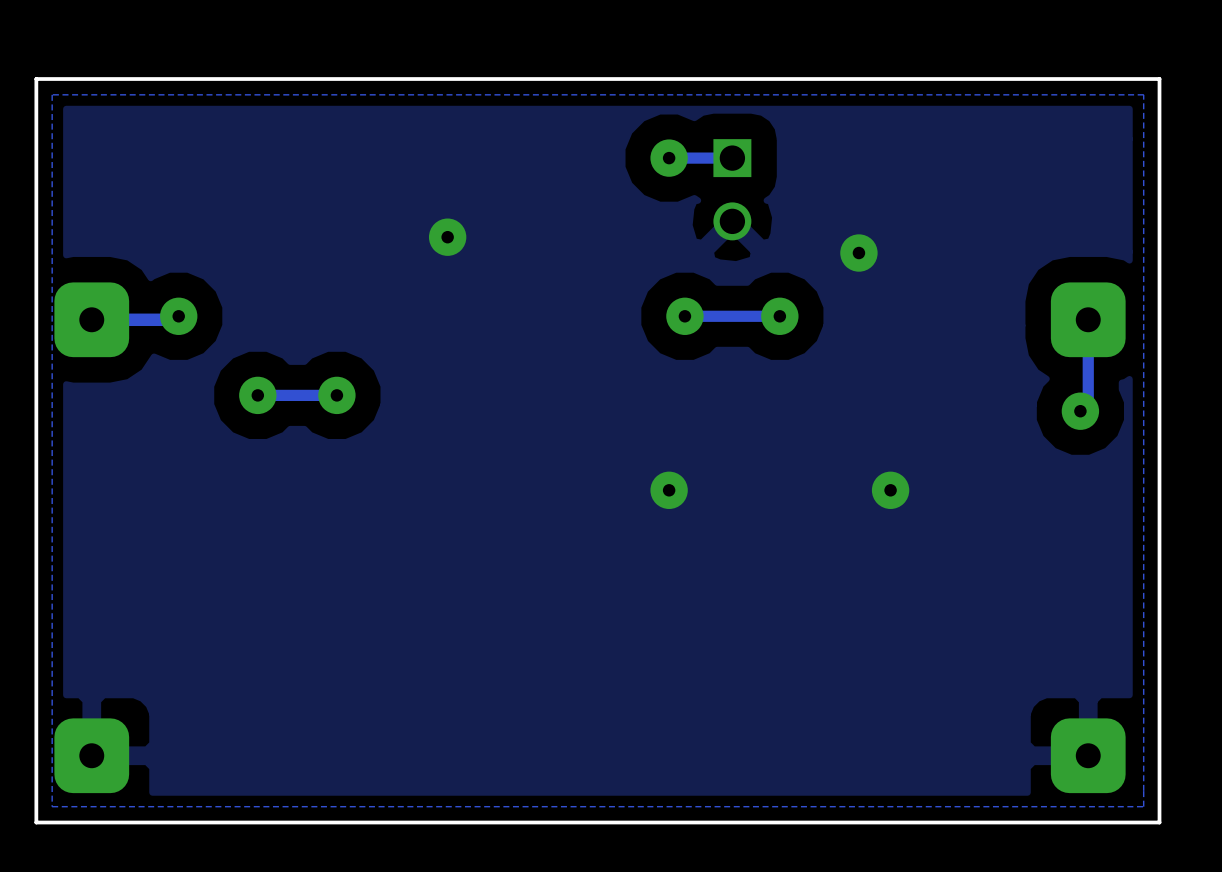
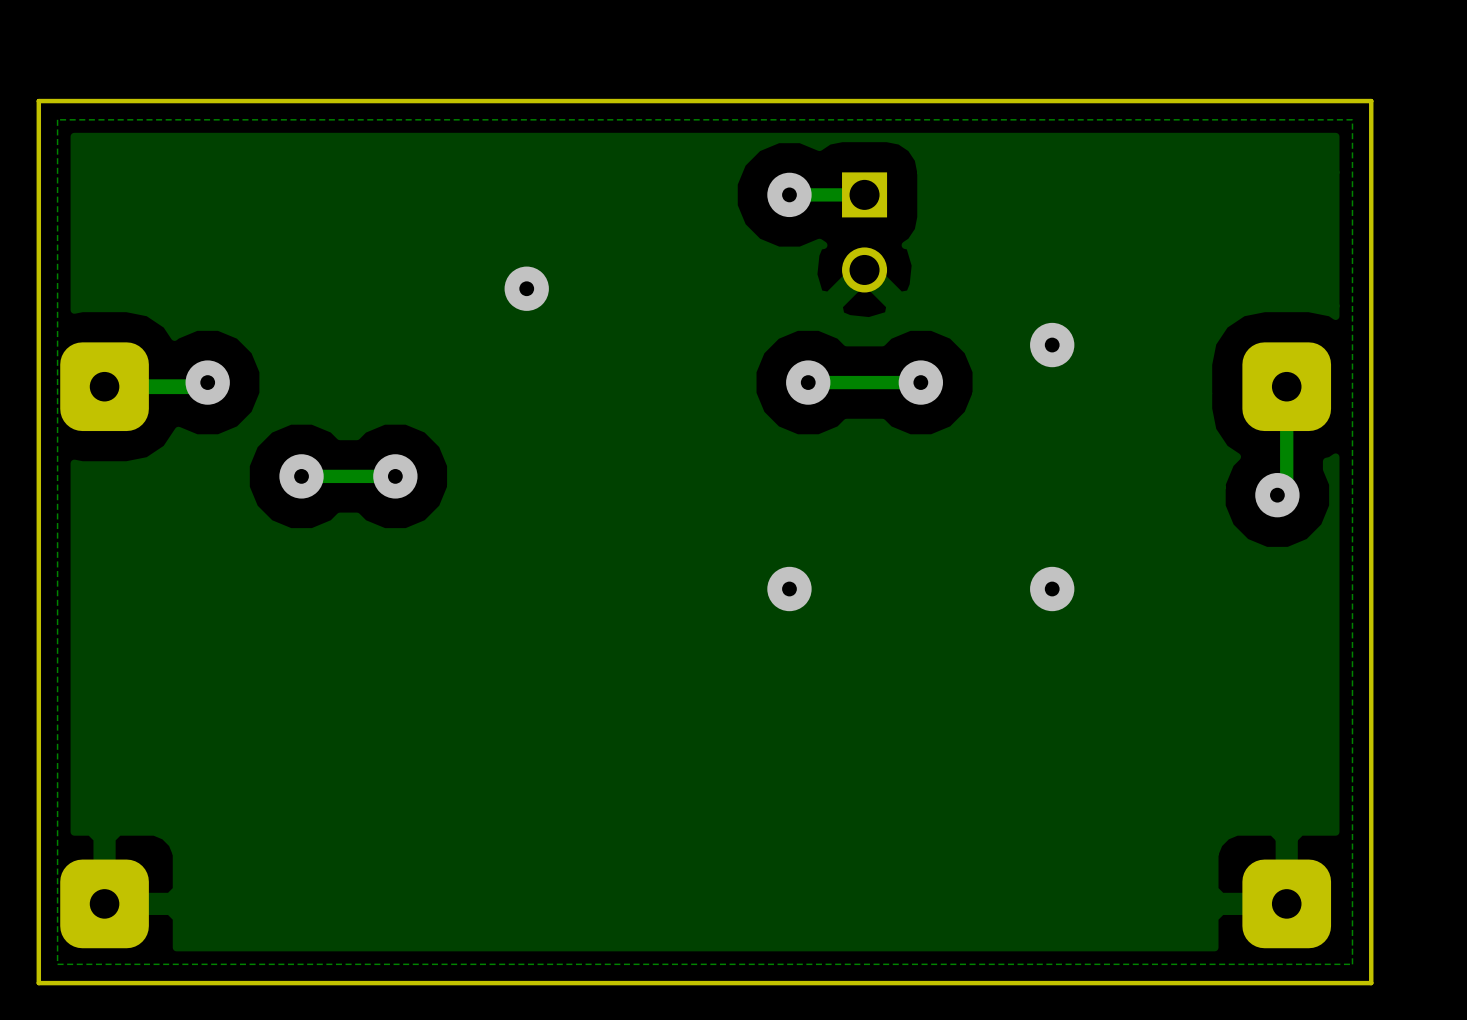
via position: (858, 253) -> (1052, 345)

